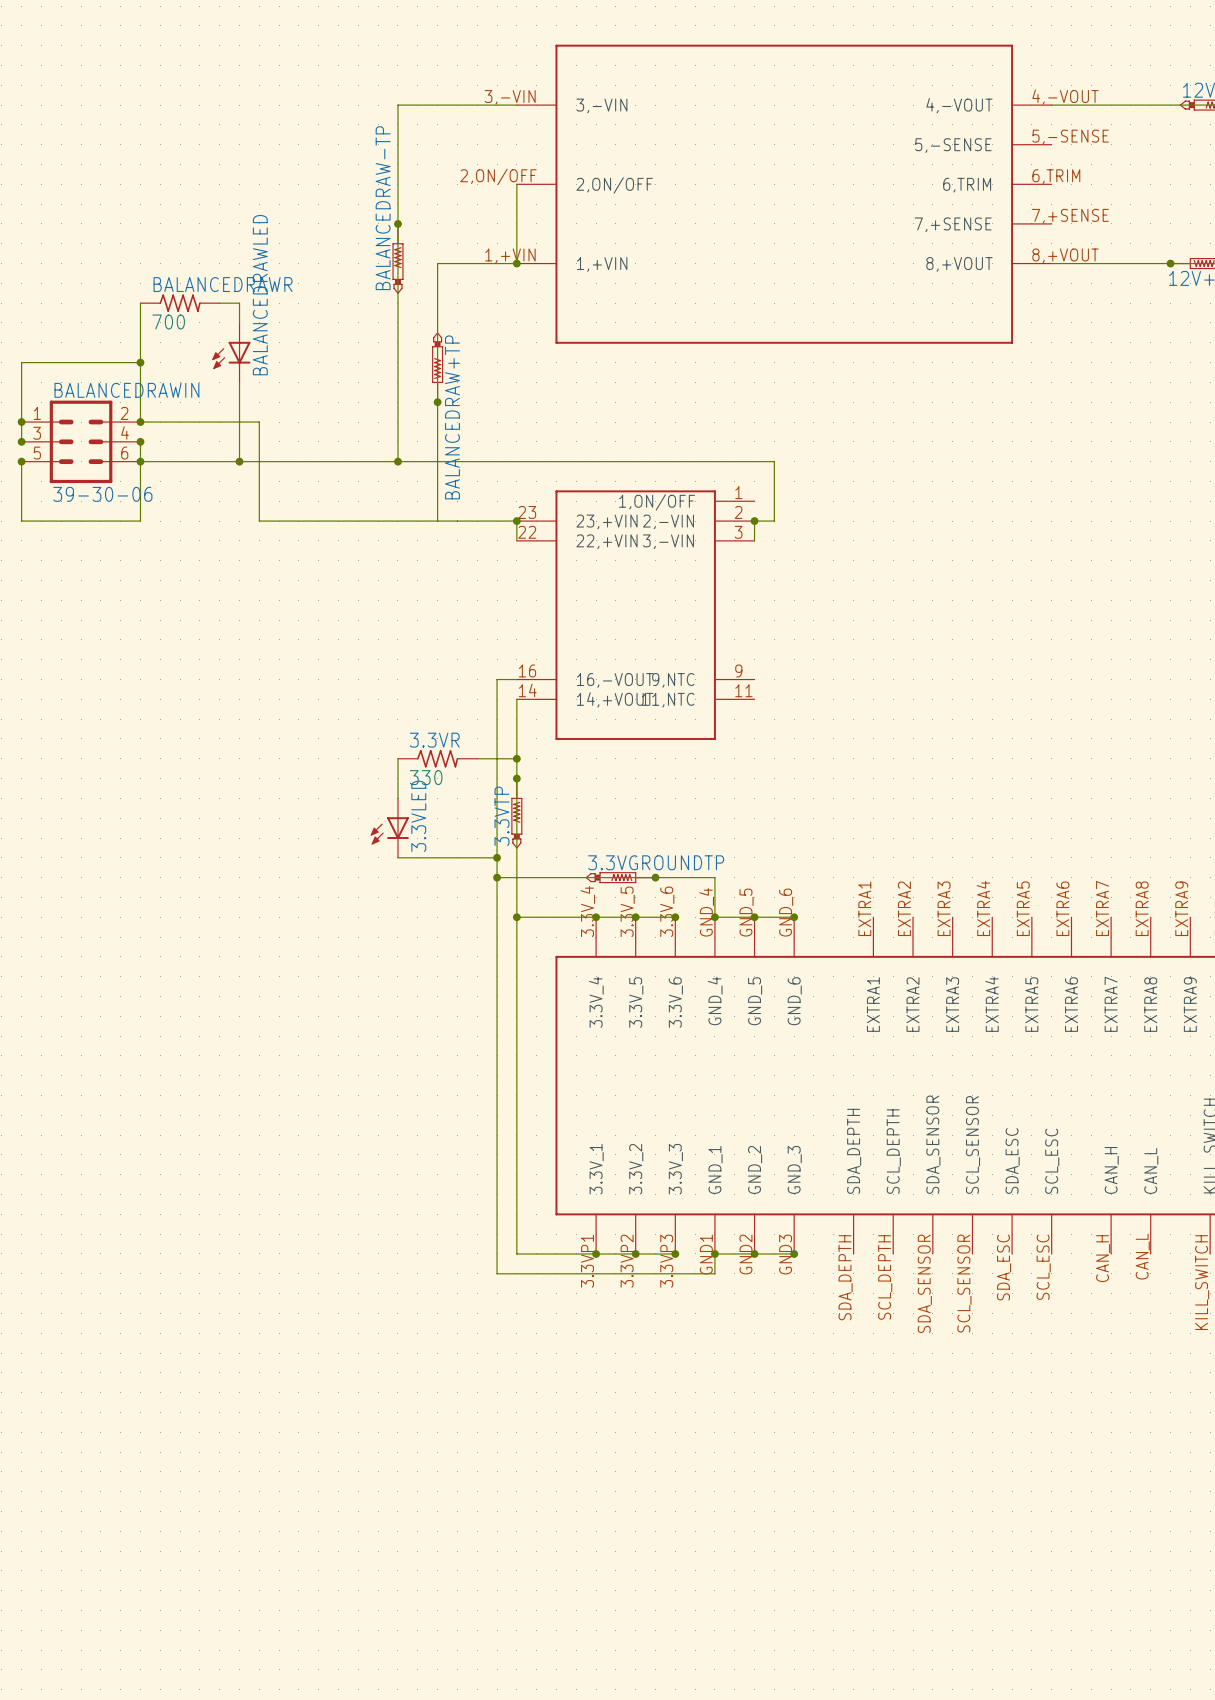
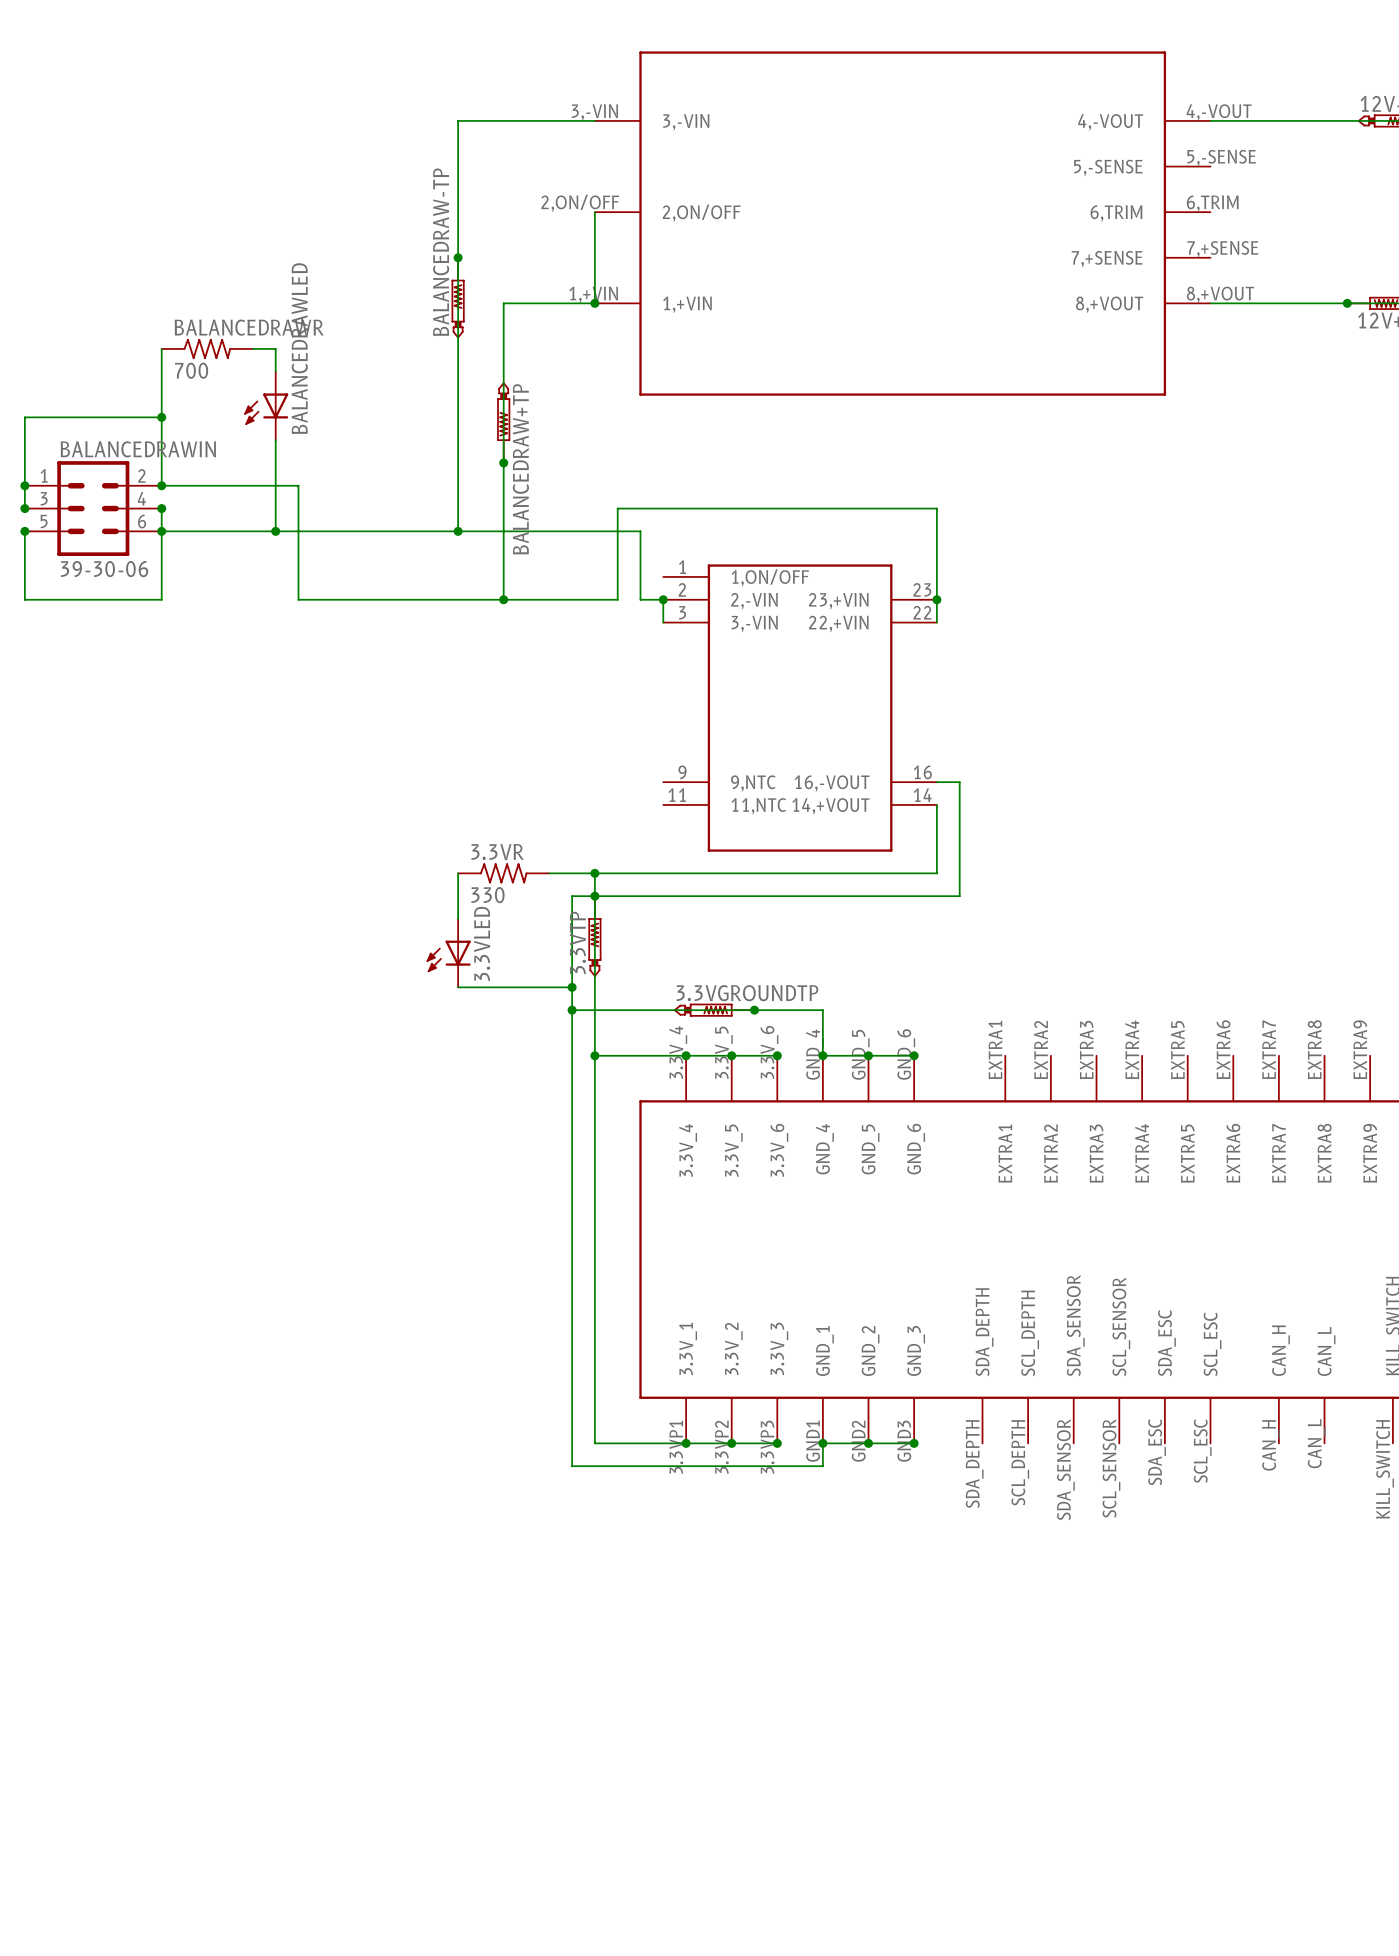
wire: (556, 461) (774, 461) (774, 521) (754, 521) (754, 540) -> (640, 531) (640, 599) (663, 599) (663, 622)
junction: none -> (503, 599)
wire: (516, 521) (516, 540) -> (594, 599) (617, 599) (617, 508) (936, 508) (936, 622)
junction: (516, 521) -> none
junction: none -> (663, 599)
junction: (754, 521) -> none
junction: none -> (936, 599)
part: (635, 615) -> none
part: none -> (800, 708)
wire: (516, 679) (497, 679) (497, 778) -> (936, 782) (959, 782) (959, 896) (572, 896)
wire: (516, 699) (516, 758) -> (936, 804) (936, 873) (594, 873)

